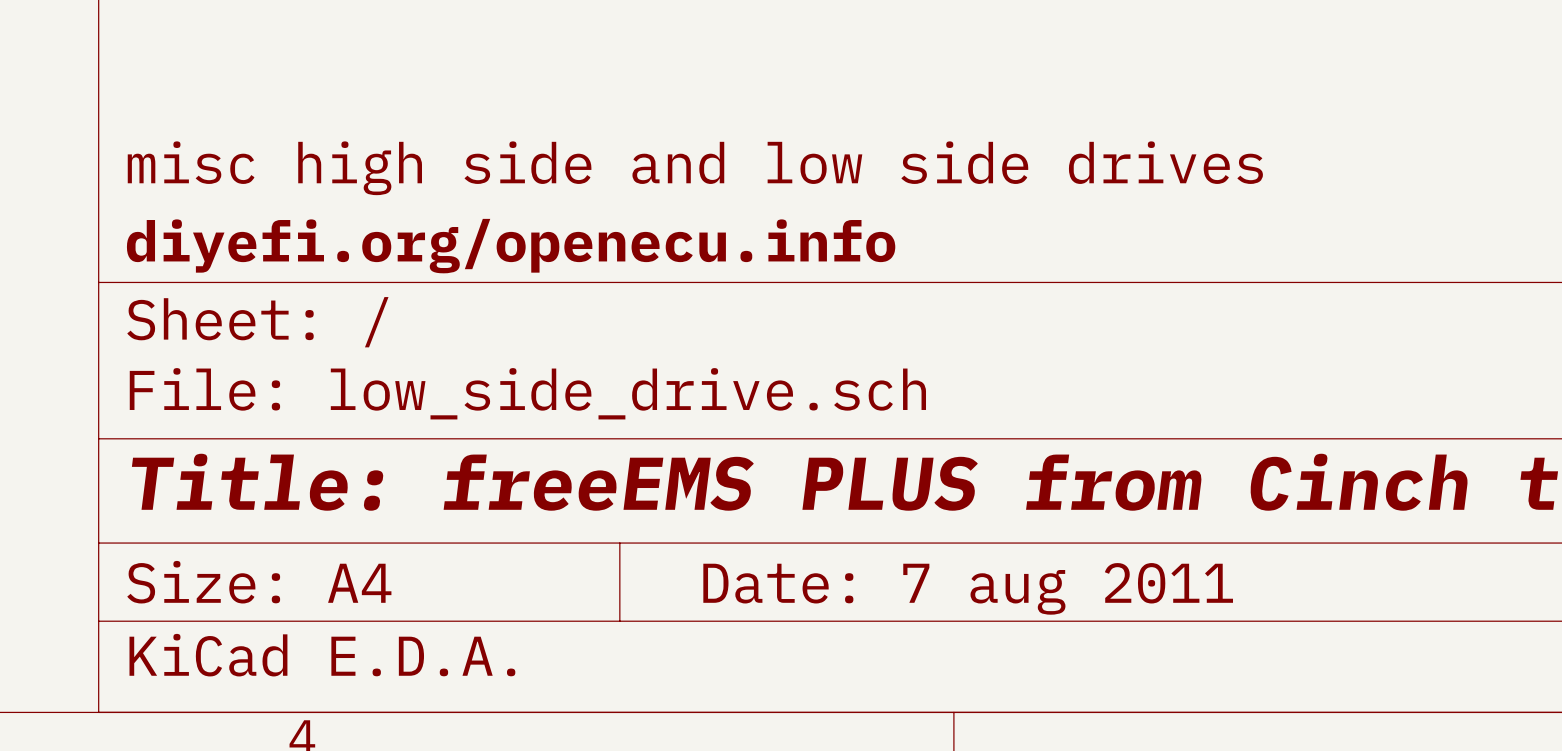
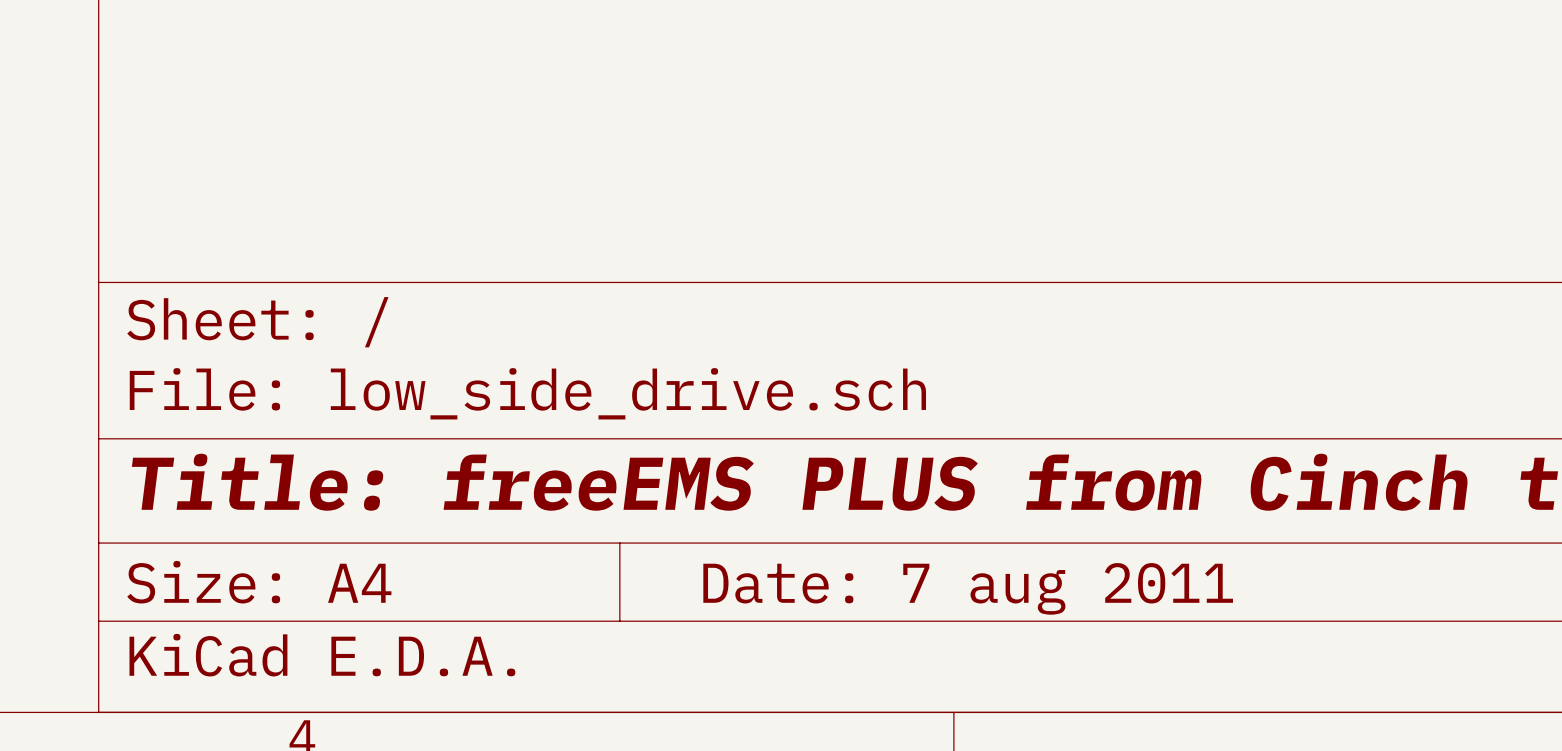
title block: misc high side and low side drives (695, 168) -> none
title block: diyefi.org/openecu.info (511, 246) -> none

